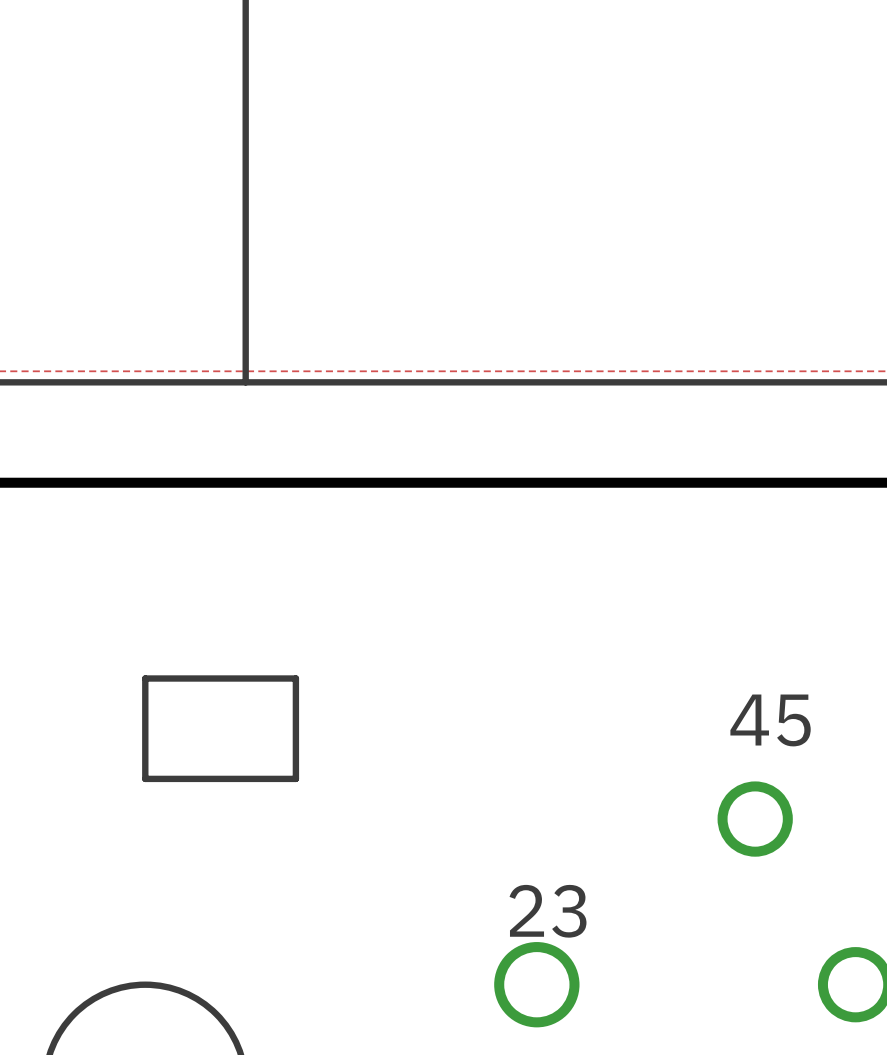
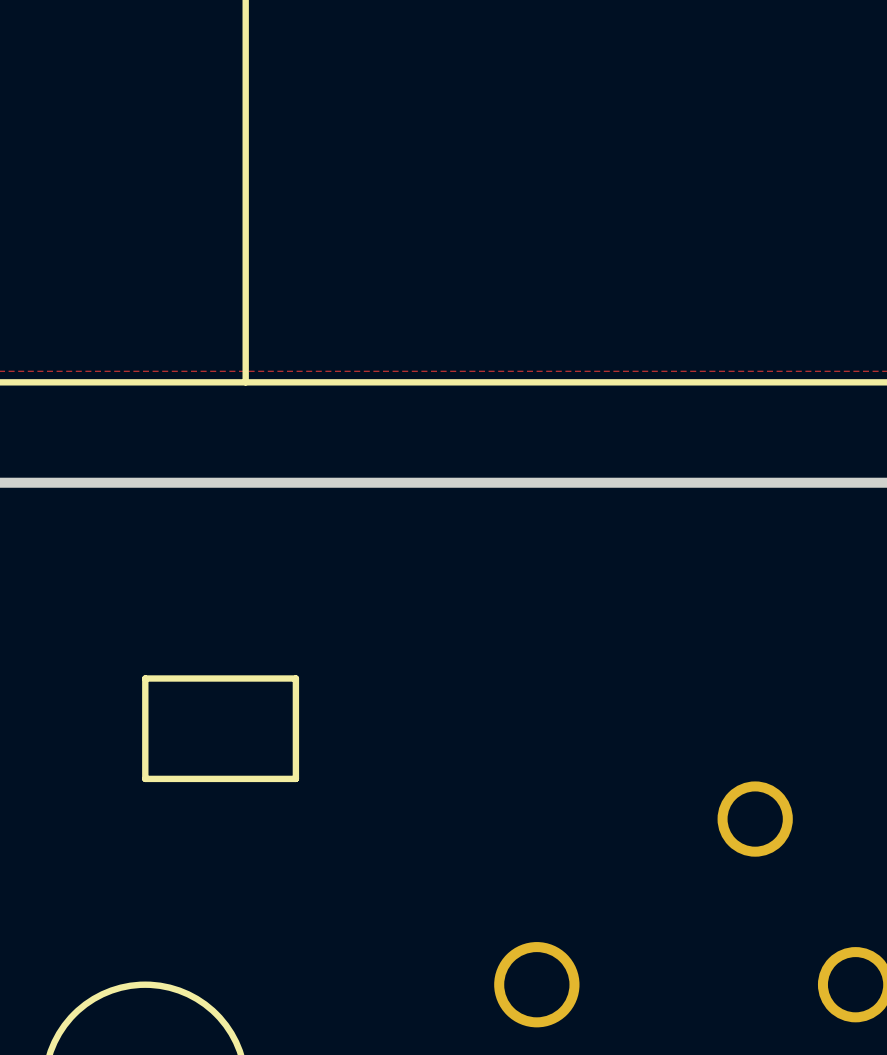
text: 45 (770, 720) -> none
text: 23 (548, 911) -> none

